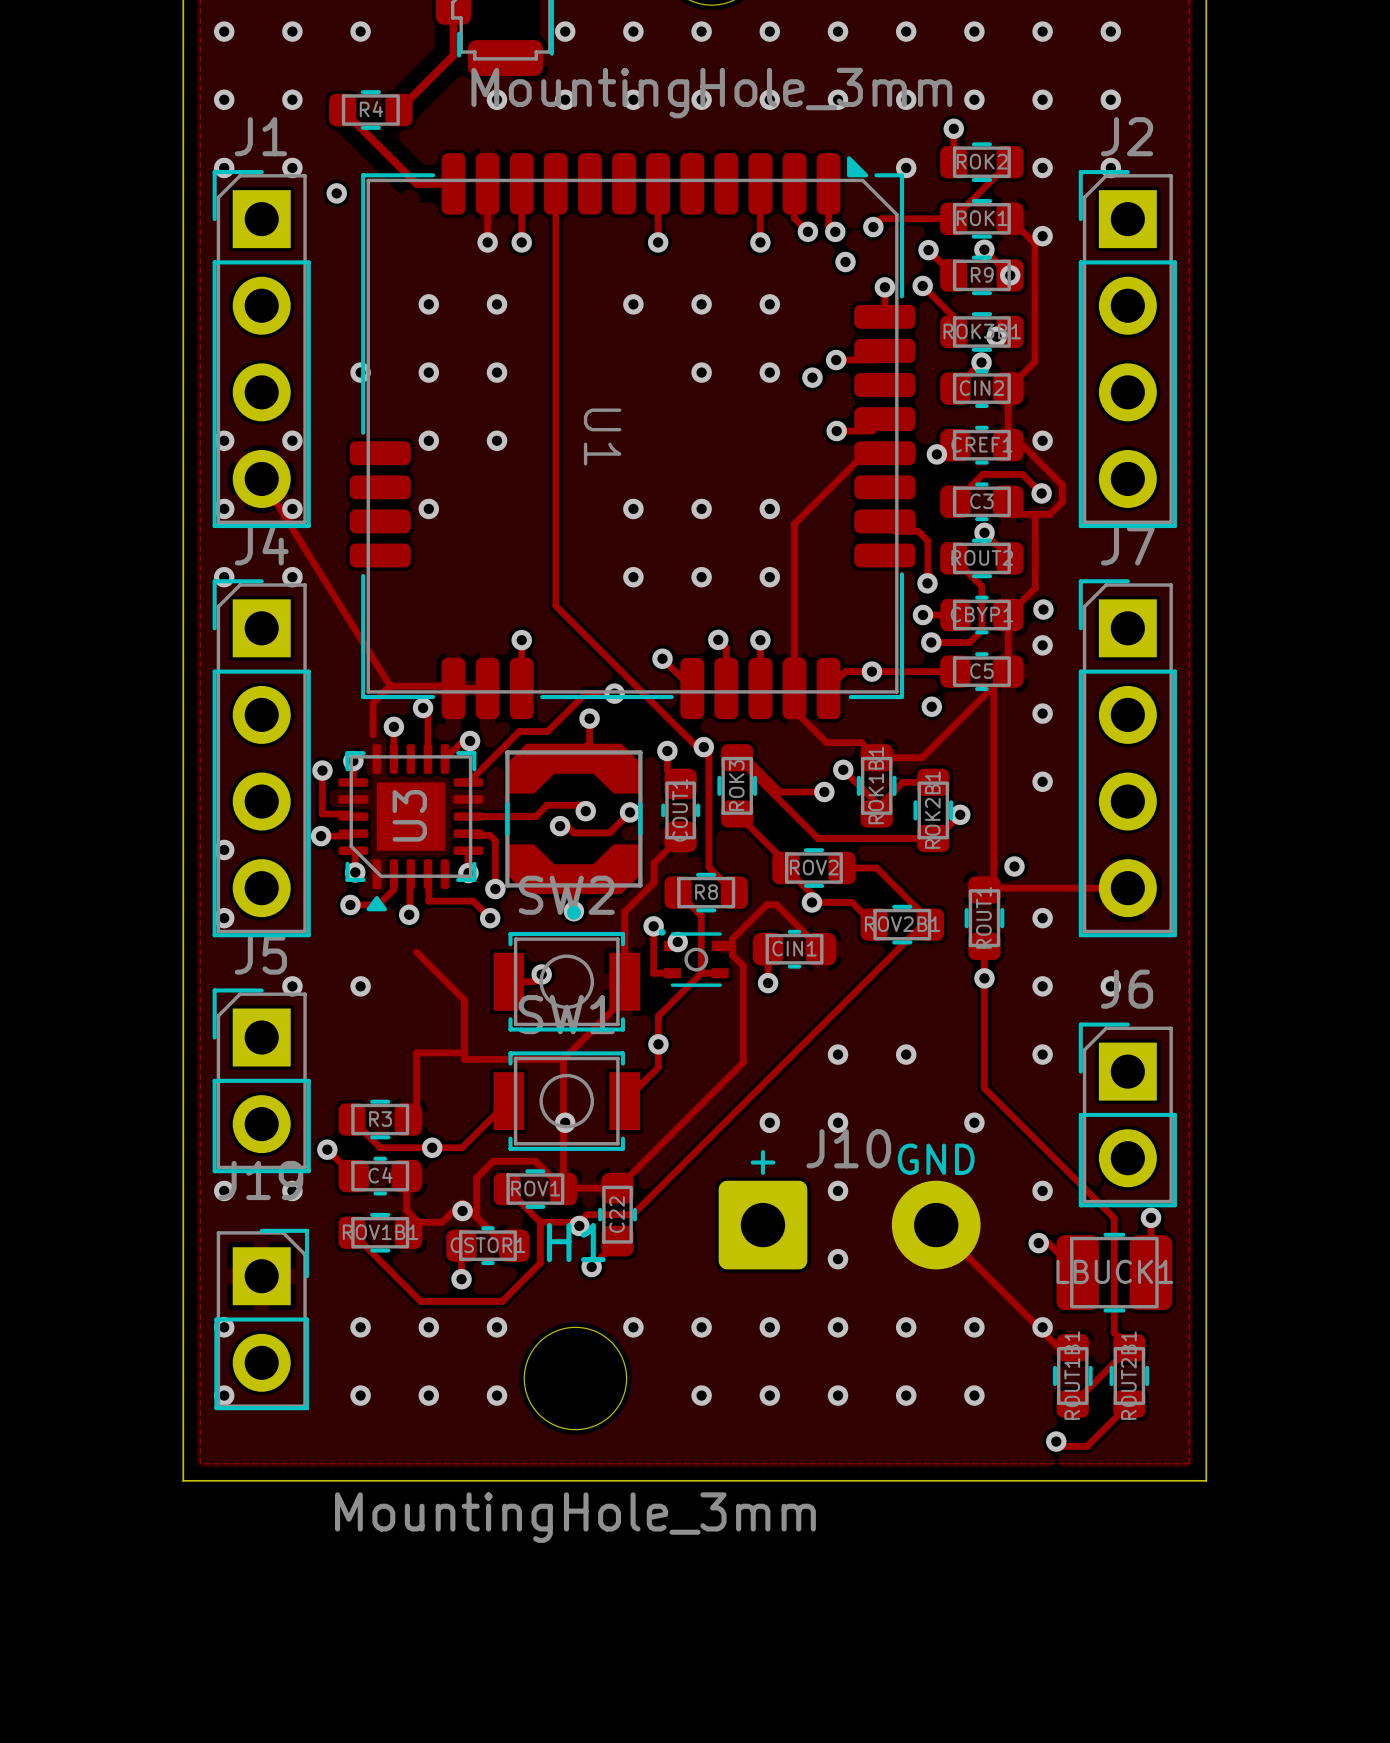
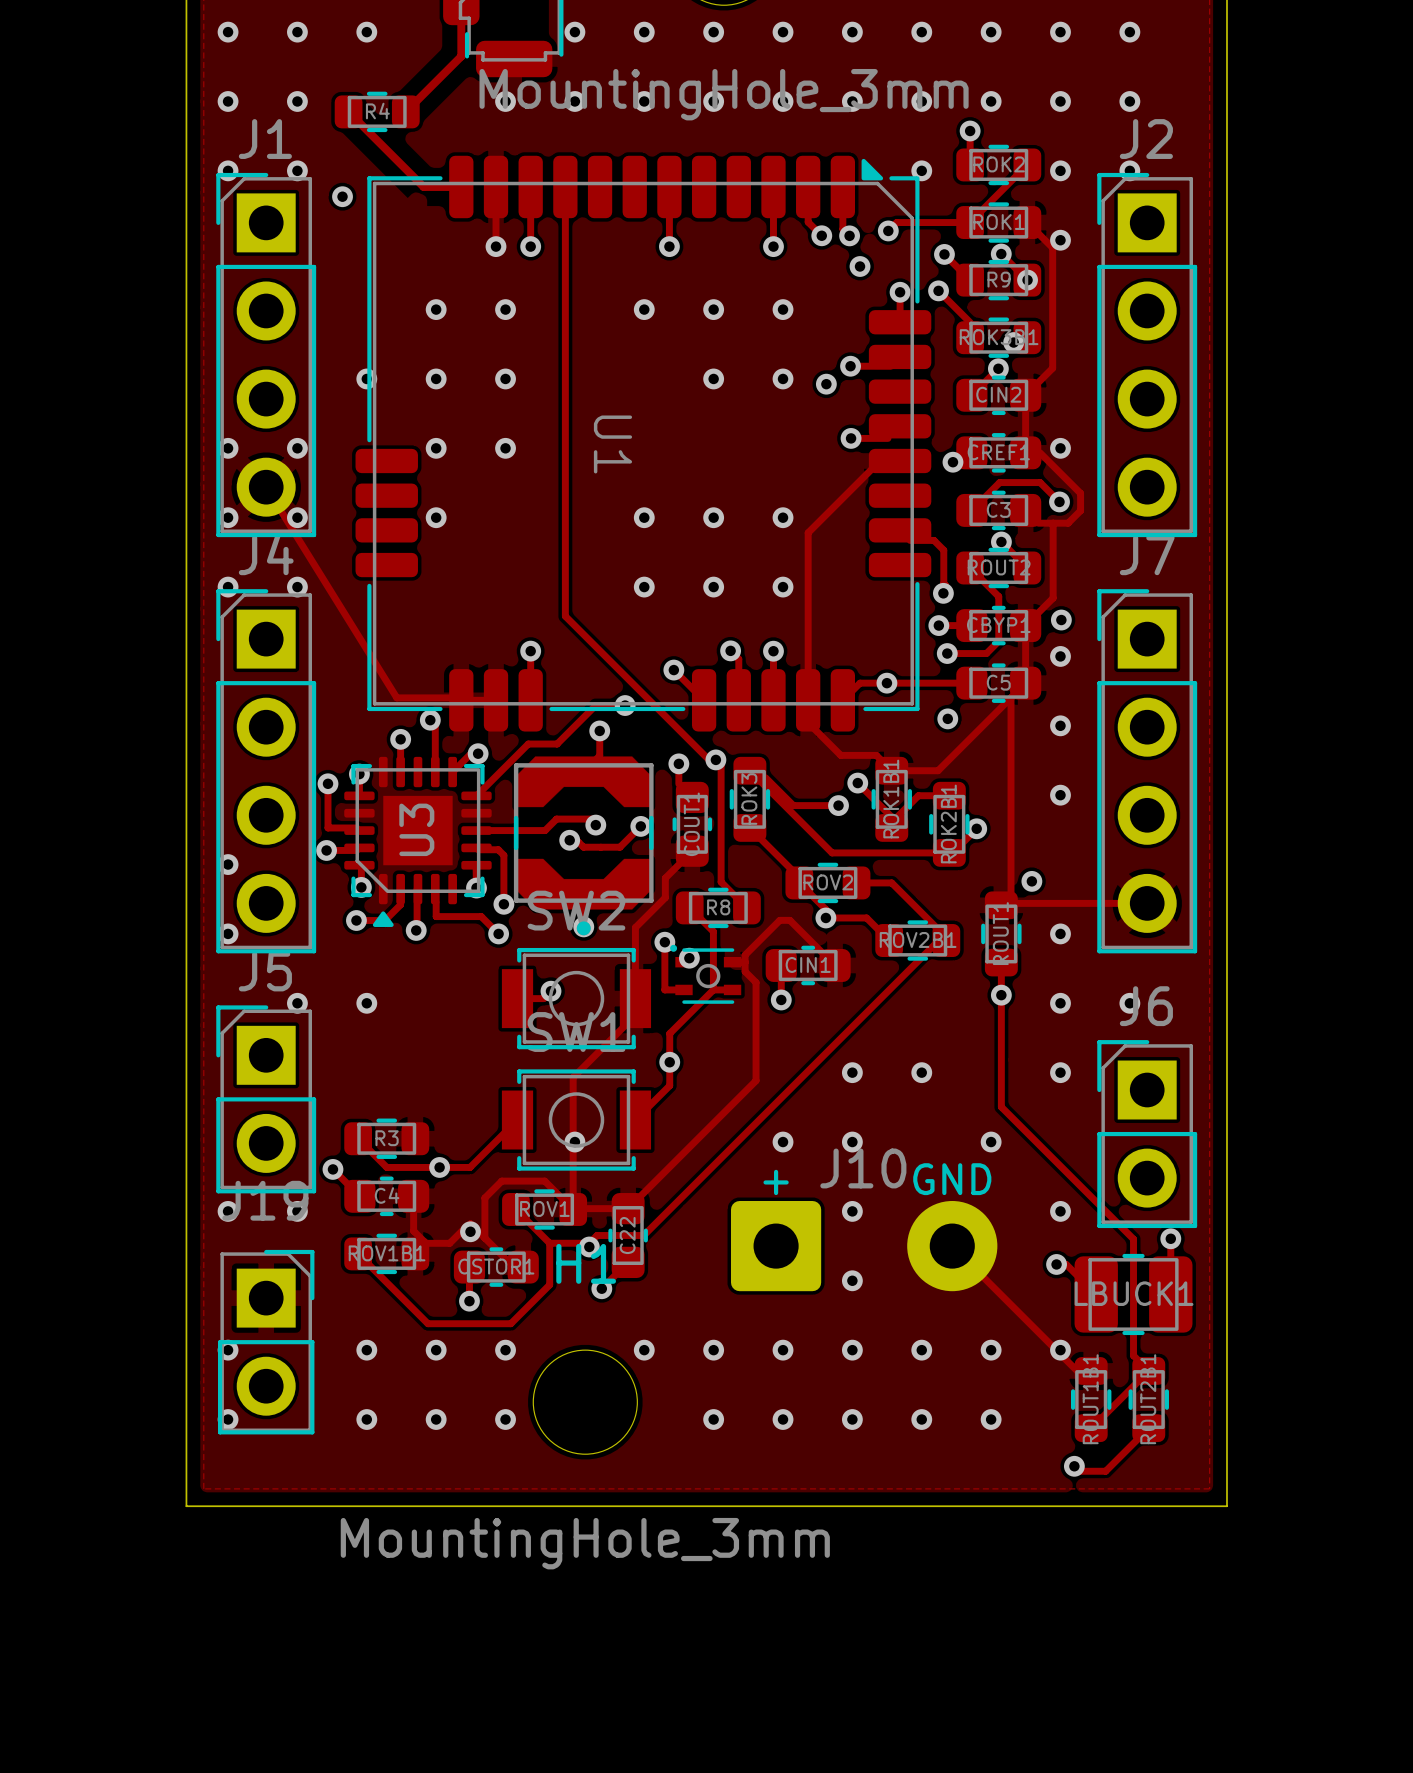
track: (390, 686) (373, 703) (373, 735) -> none
track: (416, 952) (464, 1000) (464, 1059) (563, 1059) -> none
track: (464, 1052) (416, 1052) (416, 1111) -> none

